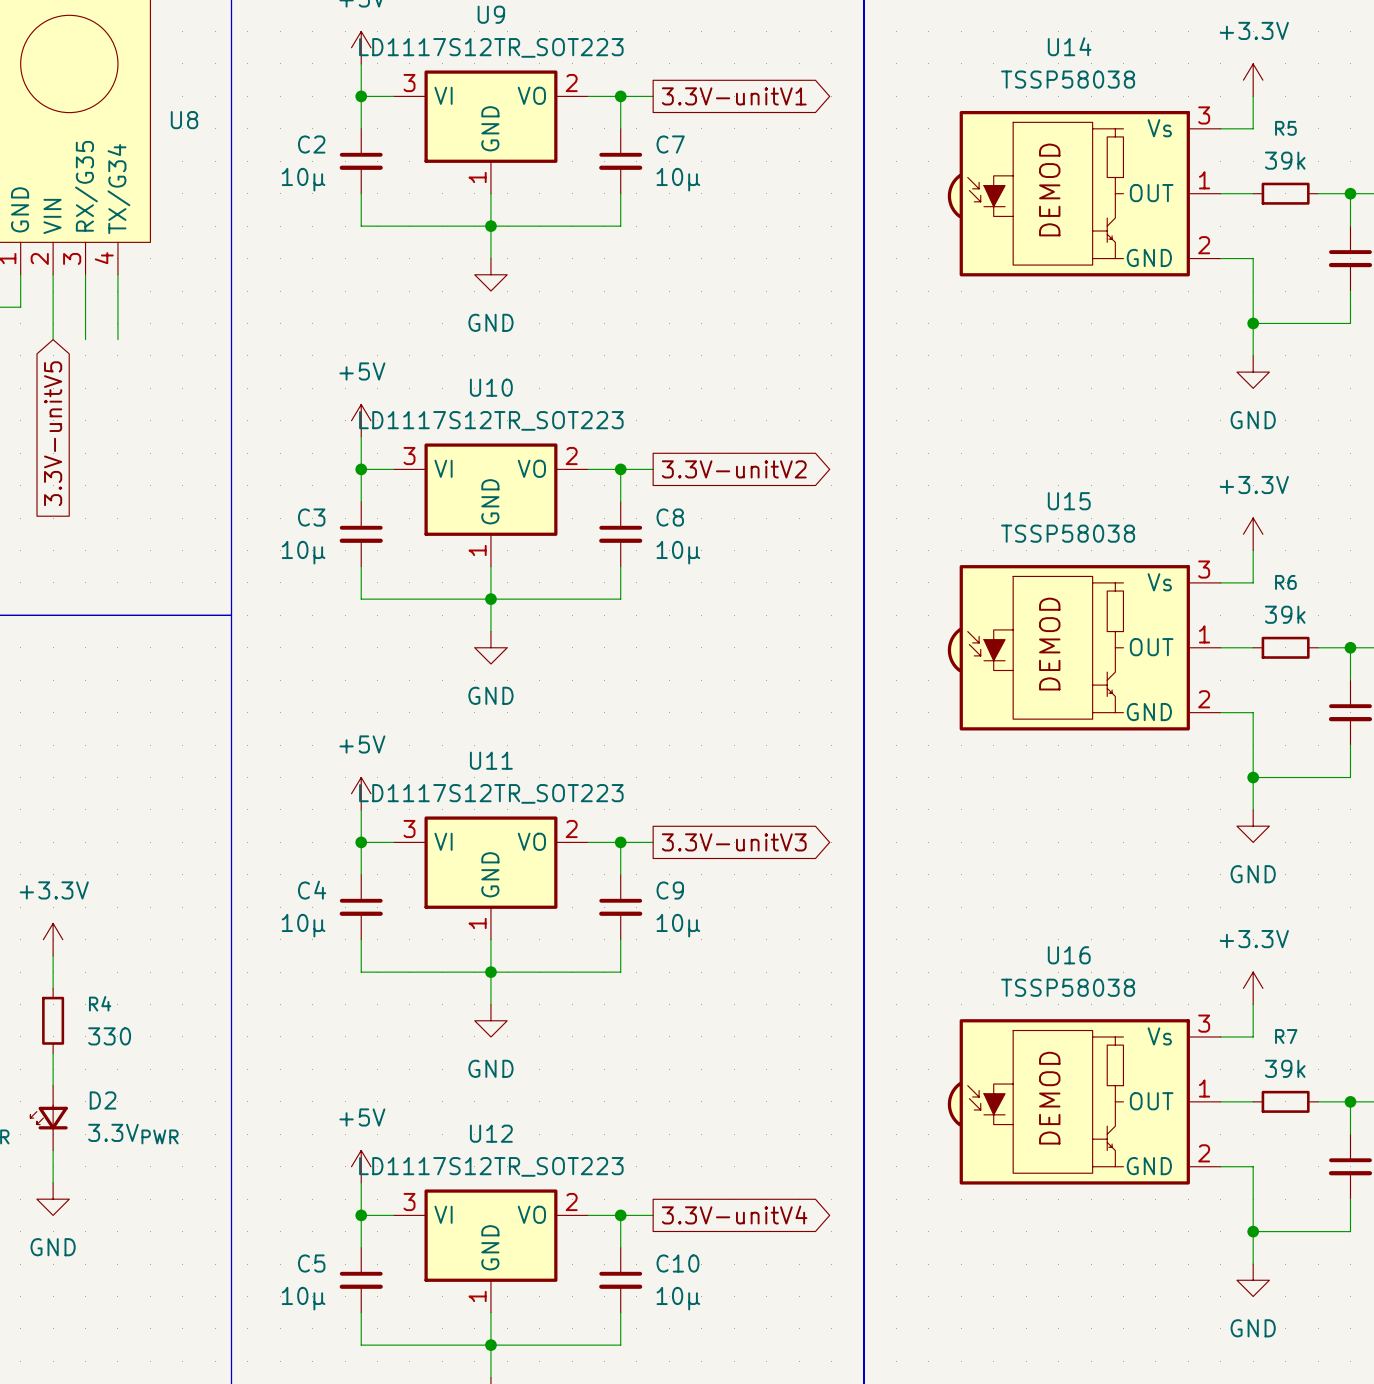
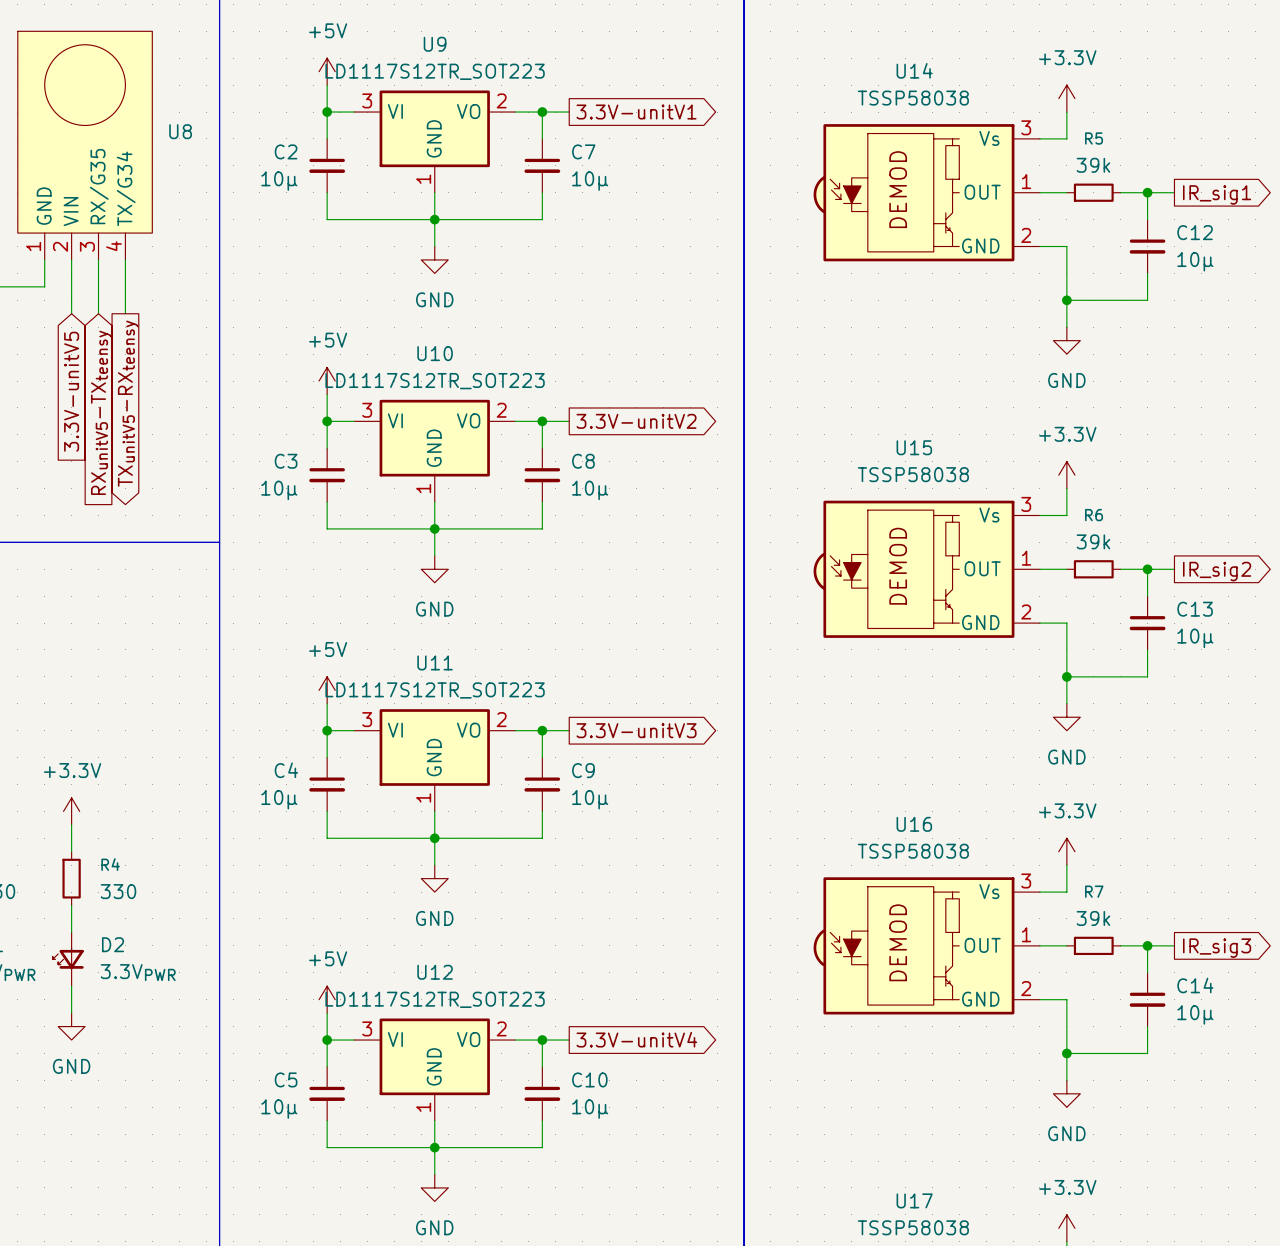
global label: none -> TXunitV5-RXteensy (128, 403)
global label: none -> RXunitV5-TXteensy (101, 412)

